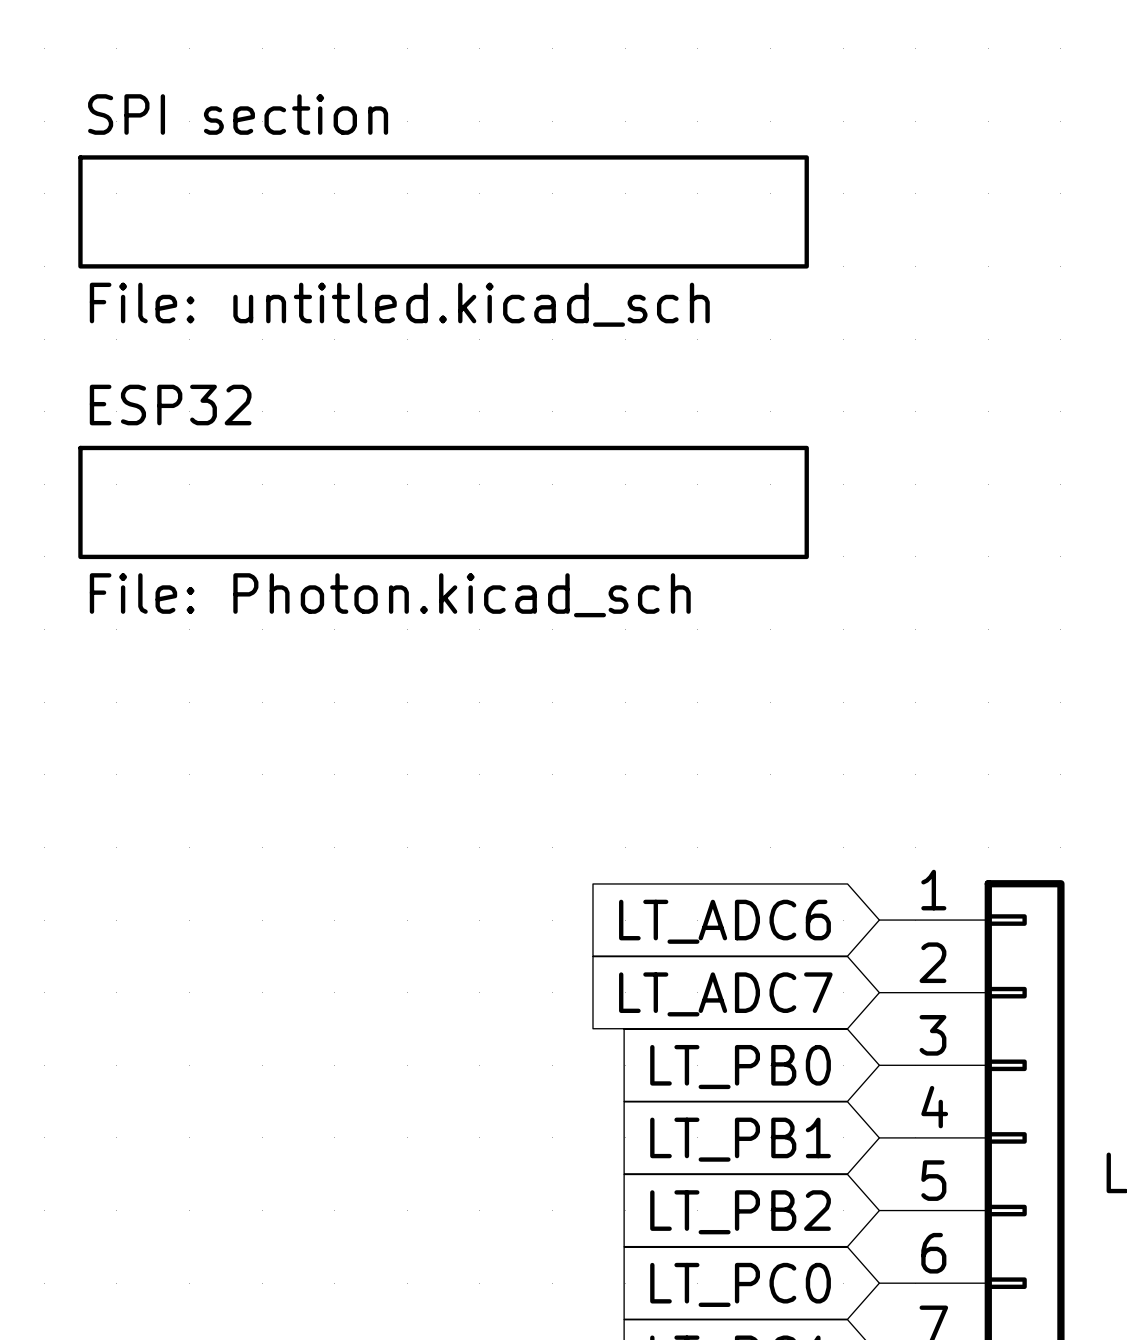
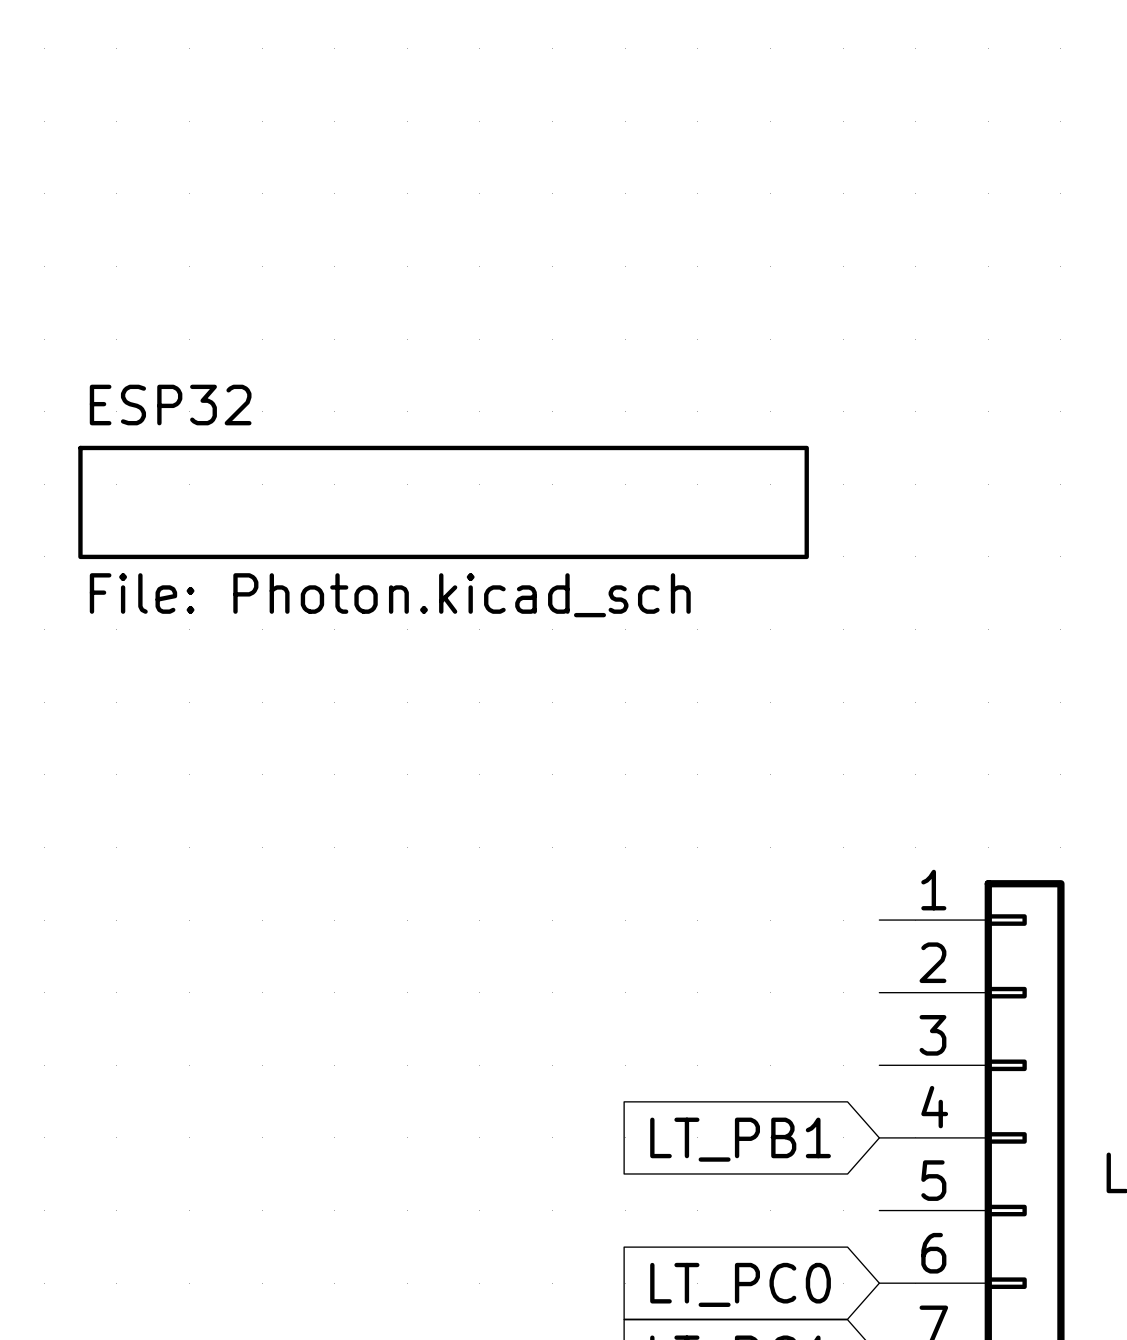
sheet SPI section: File: untitled.kicad_sch (443, 211) -> none
global label: LT_ADC6 (724, 921) -> none
global label: LT_ADC7 (725, 994) -> none
global label: LT_PB0 (740, 1067) -> none
global label: LT_PB2 (740, 1212) -> none

